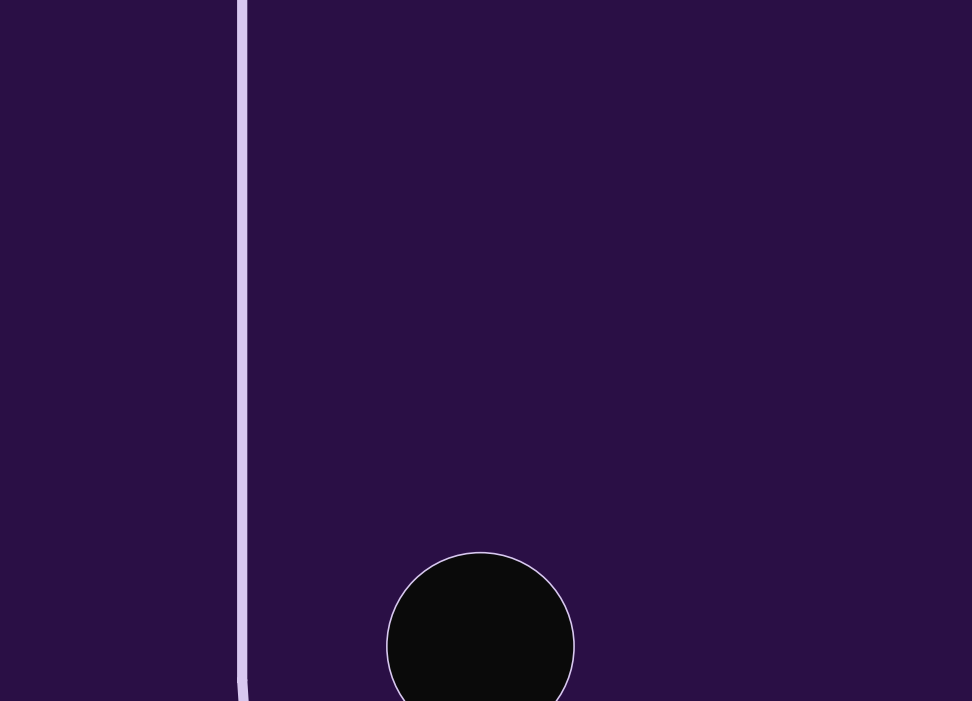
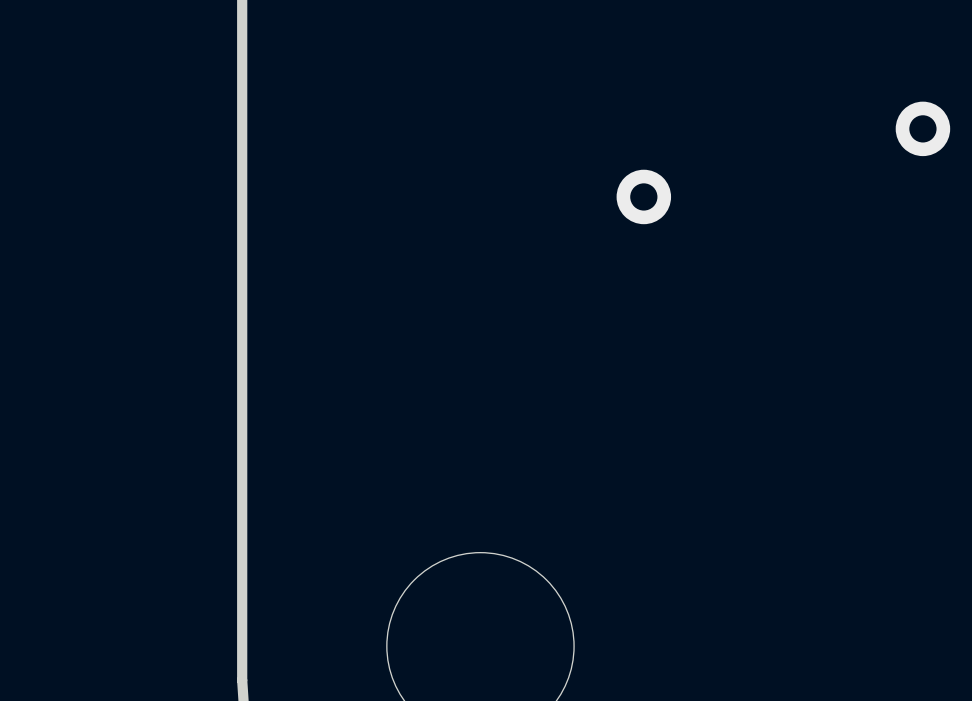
via: none -> (922, 128)
via: none -> (643, 196)

